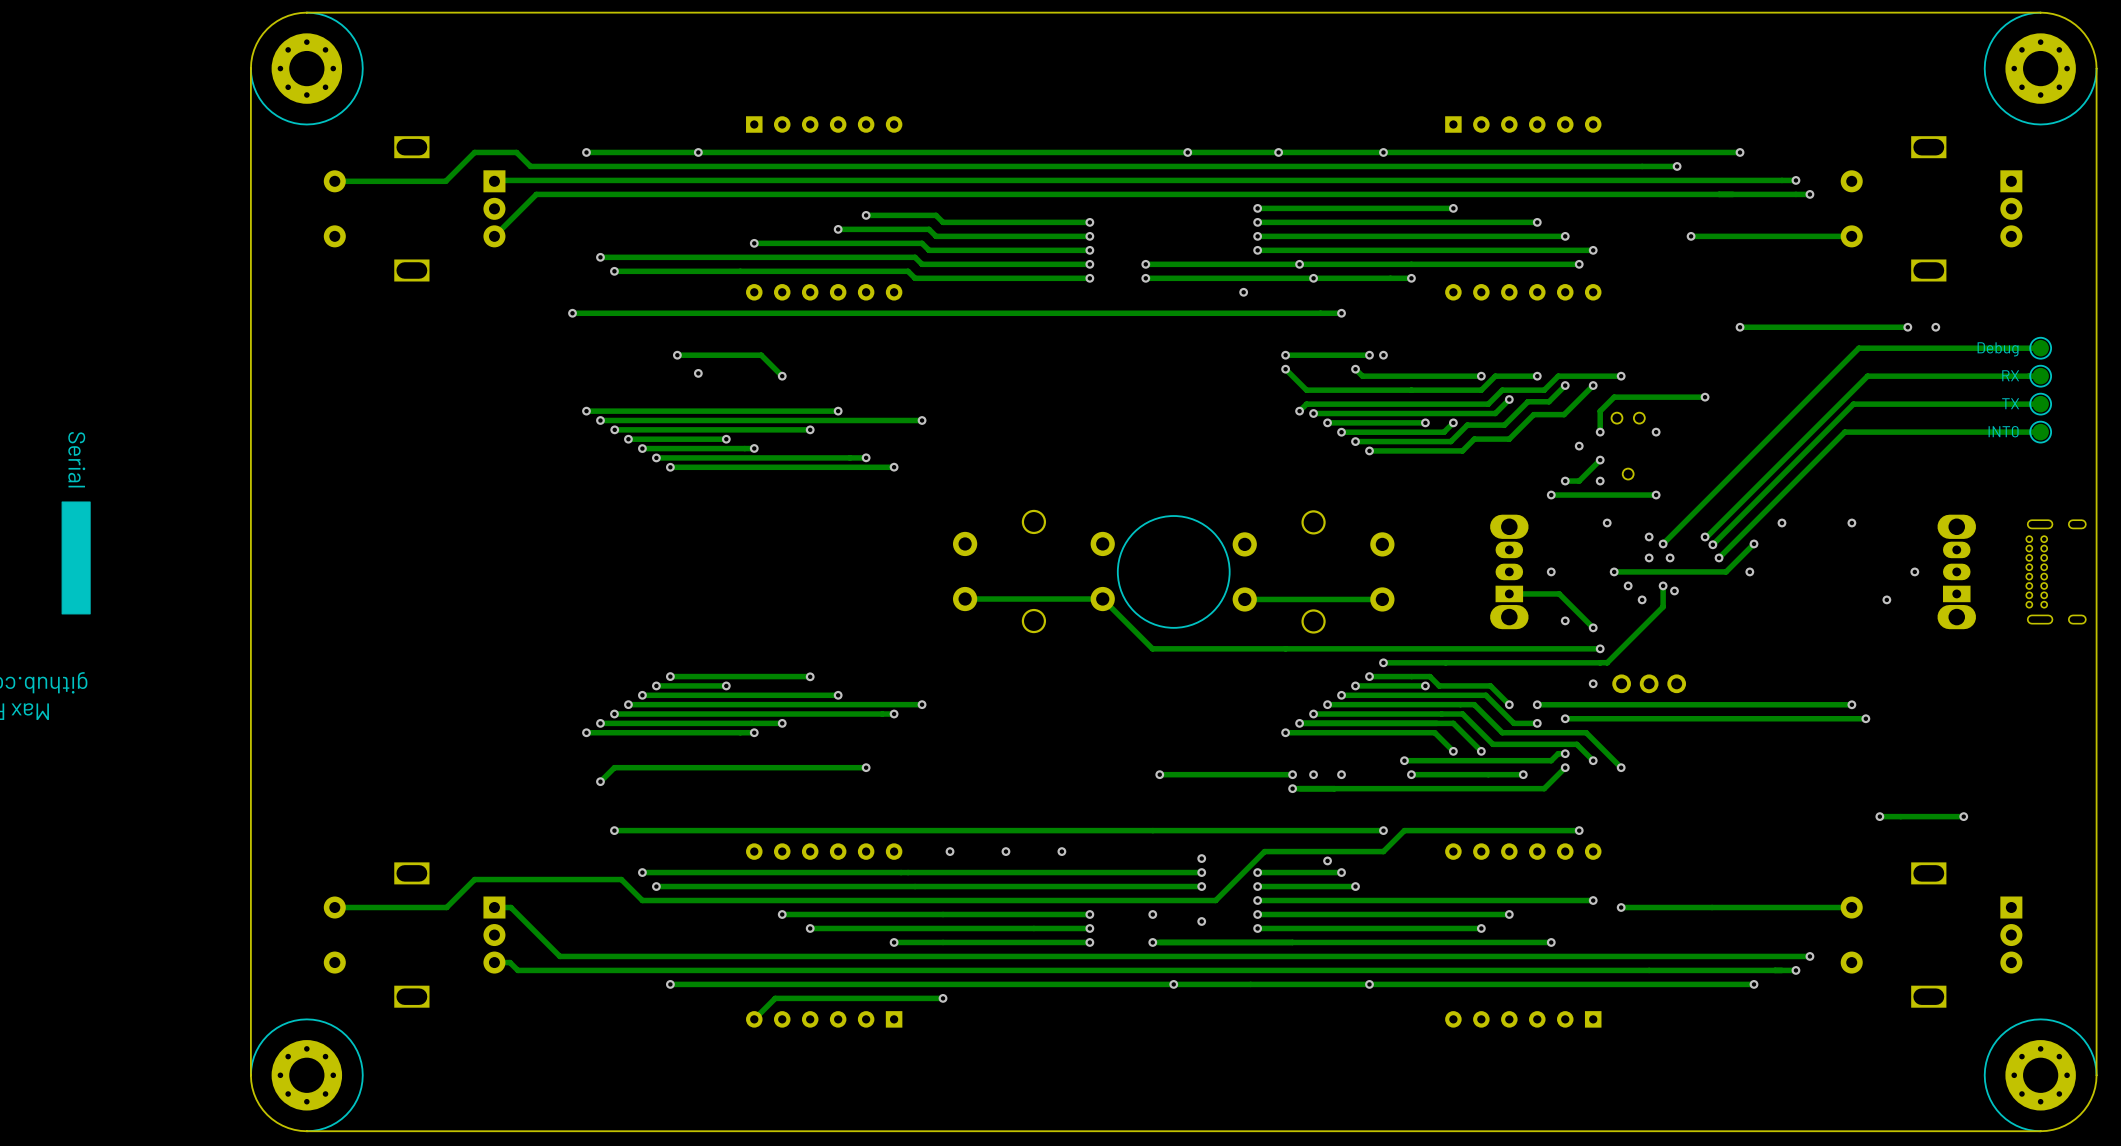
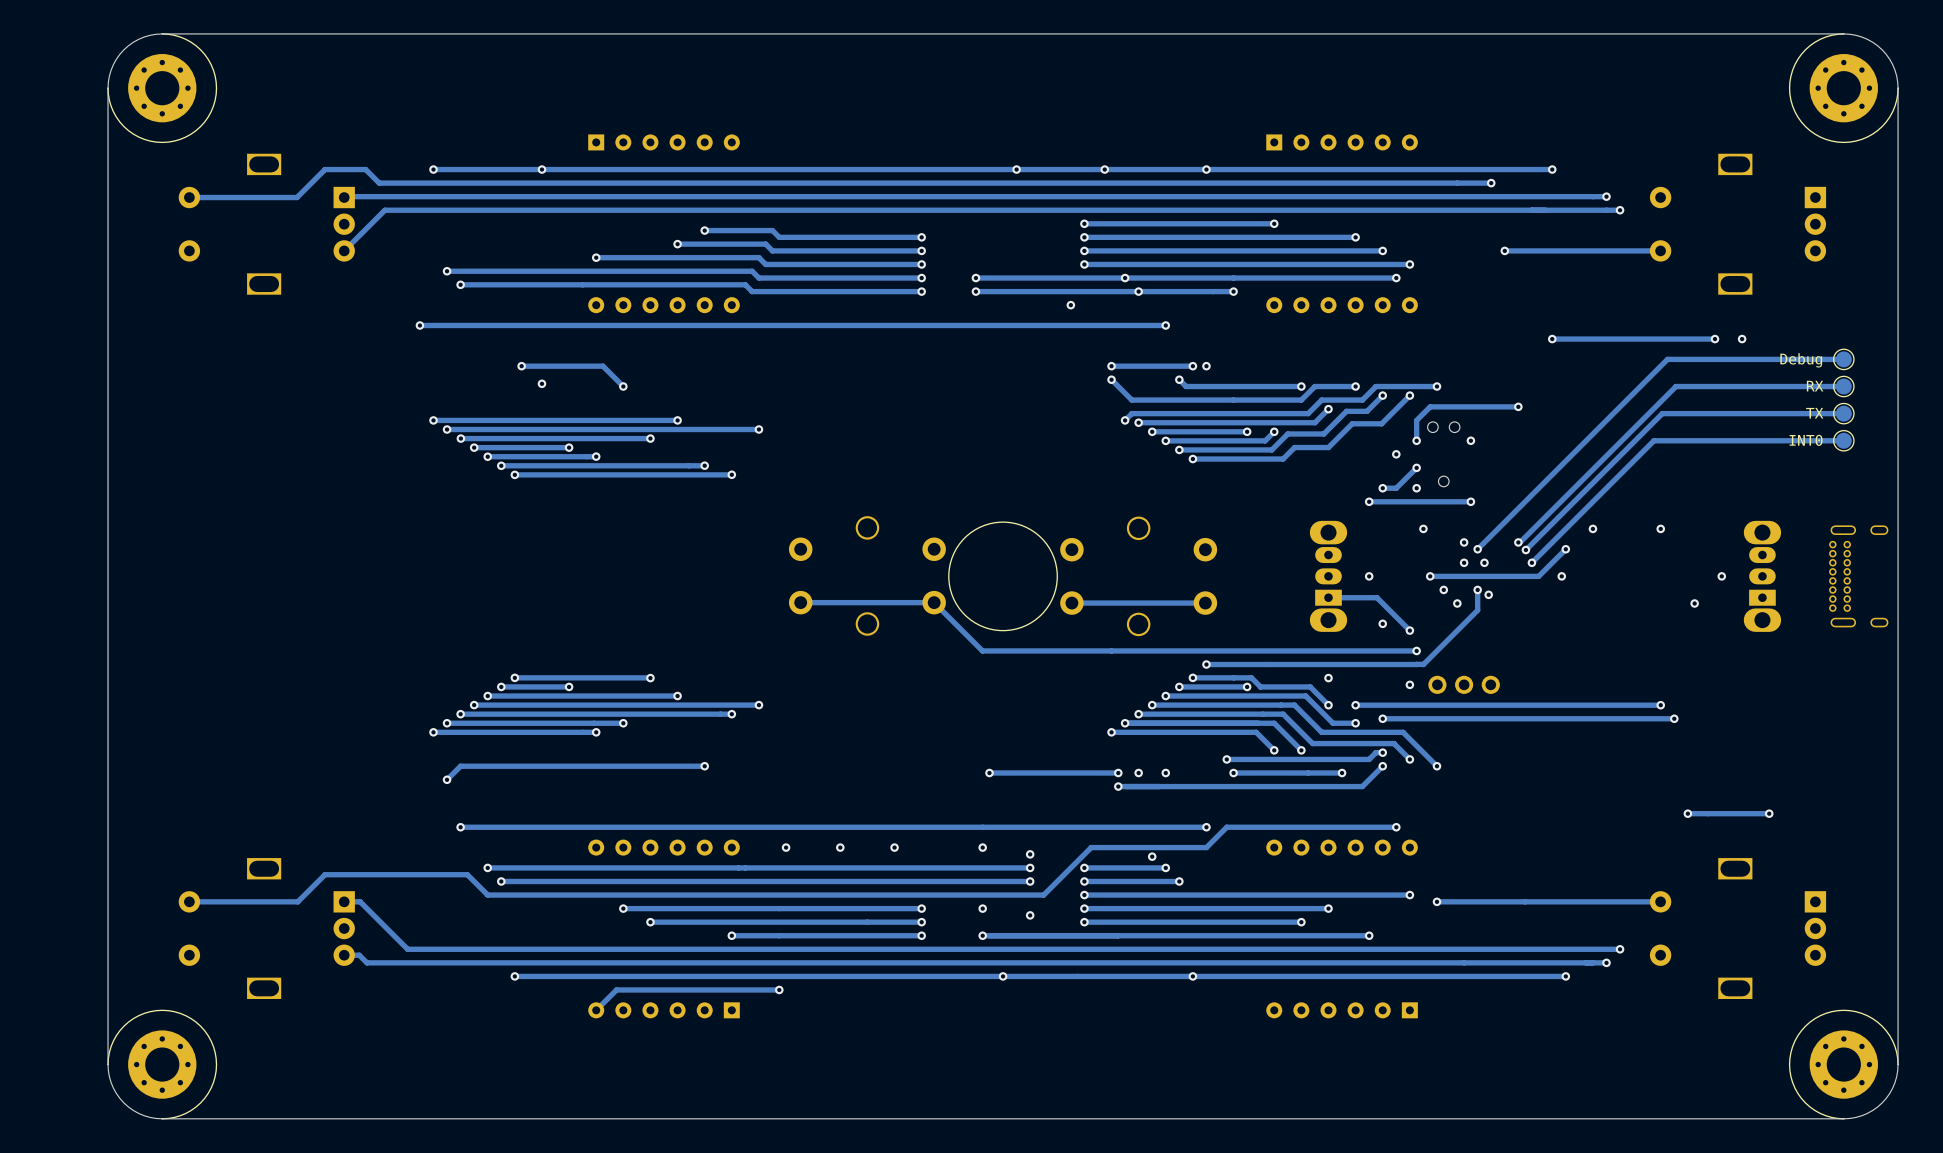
via: none -> (1328, 678)
via: none -> (982, 847)

